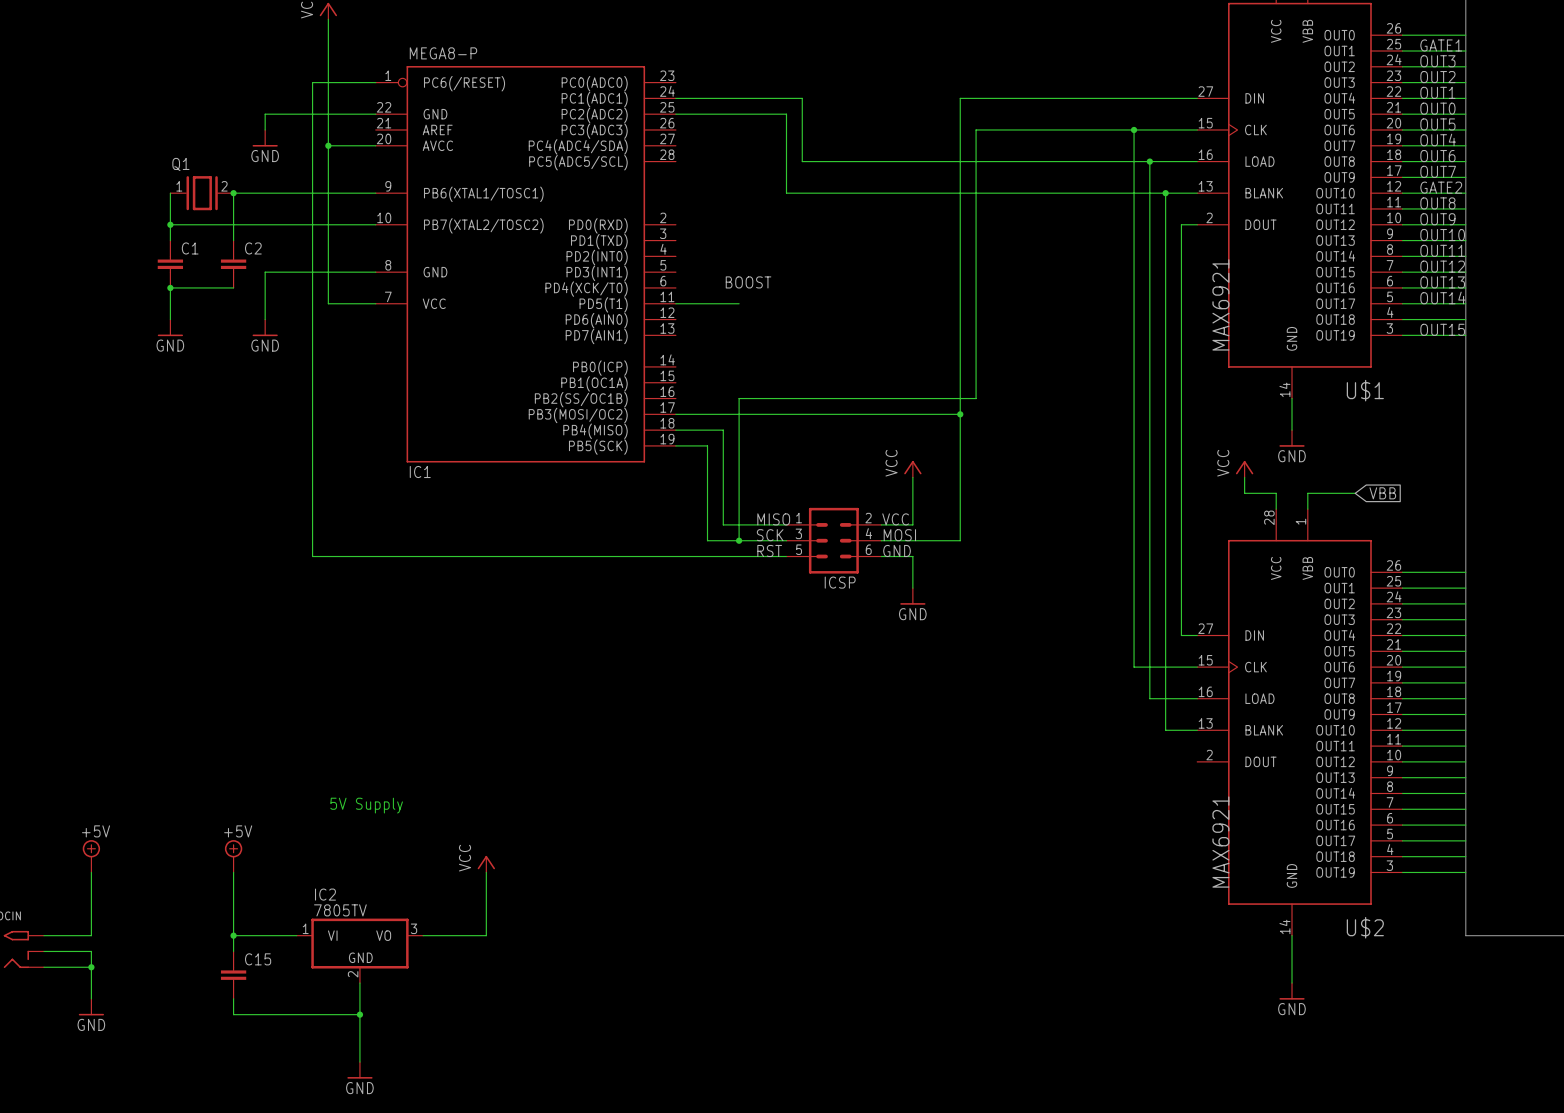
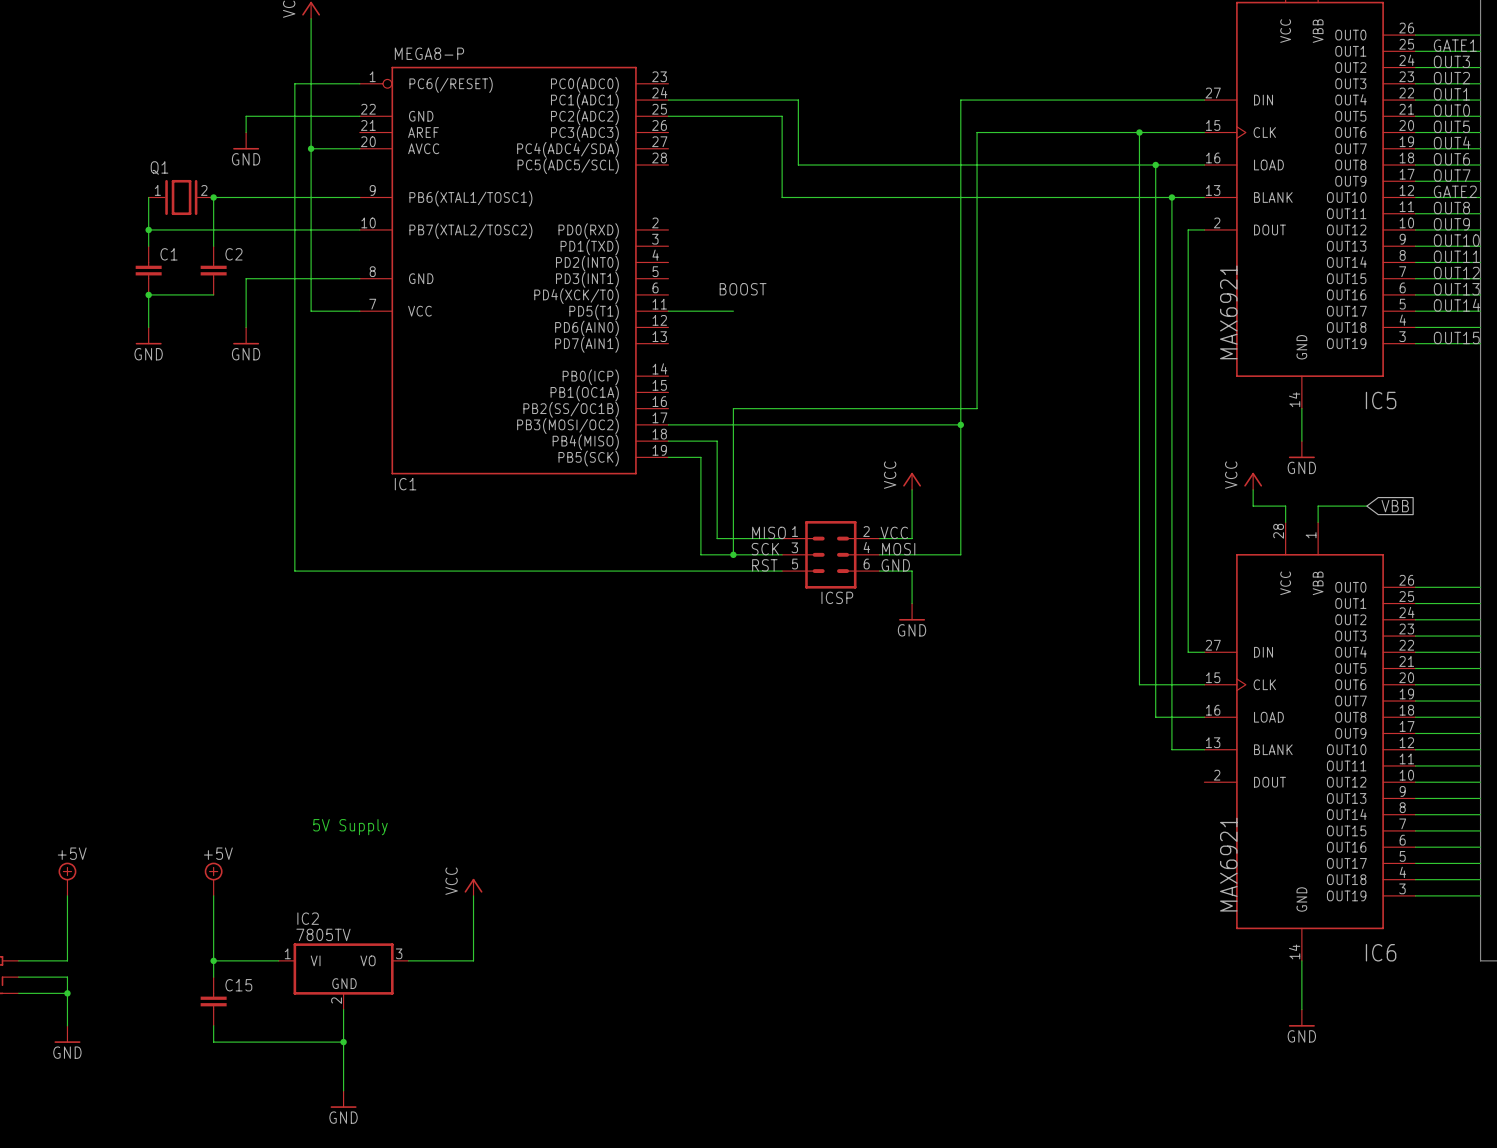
U$1 name: U$1 (1365, 390) -> IC5 (1381, 400)
U$2 name: U$2 (1365, 927) -> IC6 (1381, 952)

